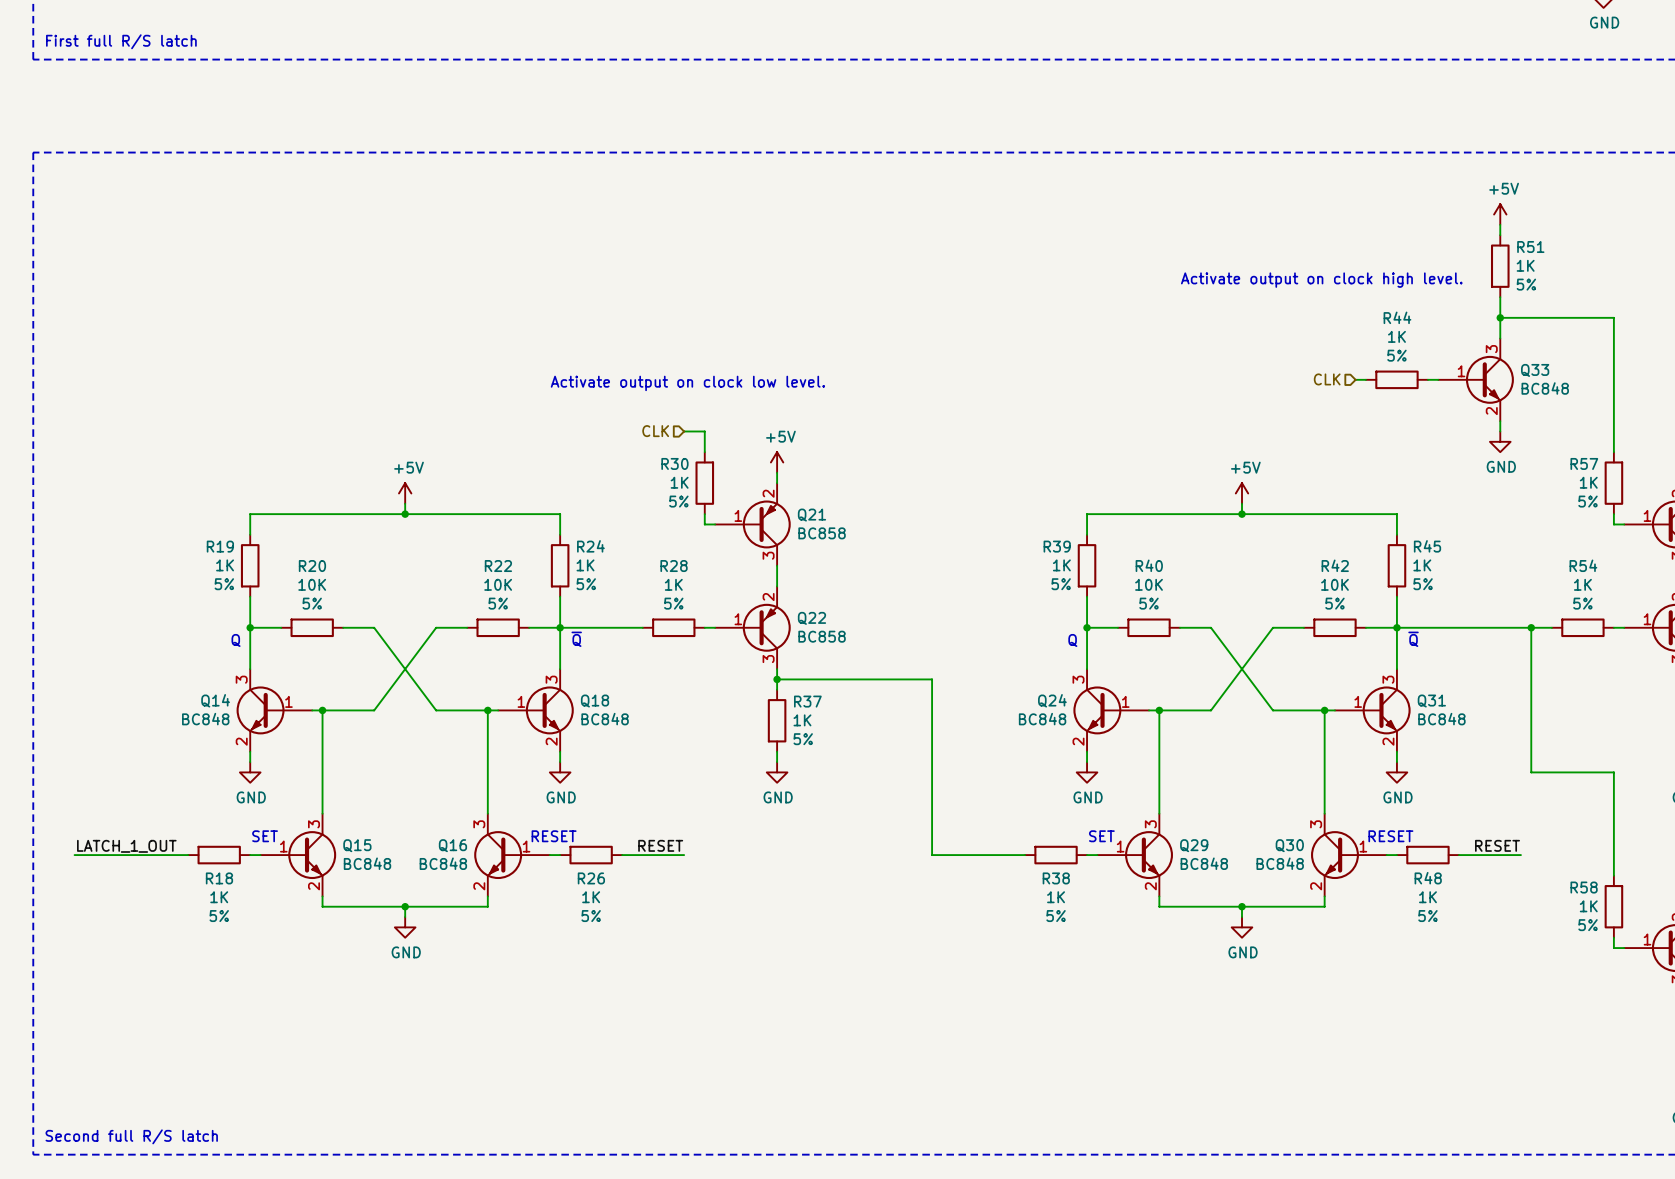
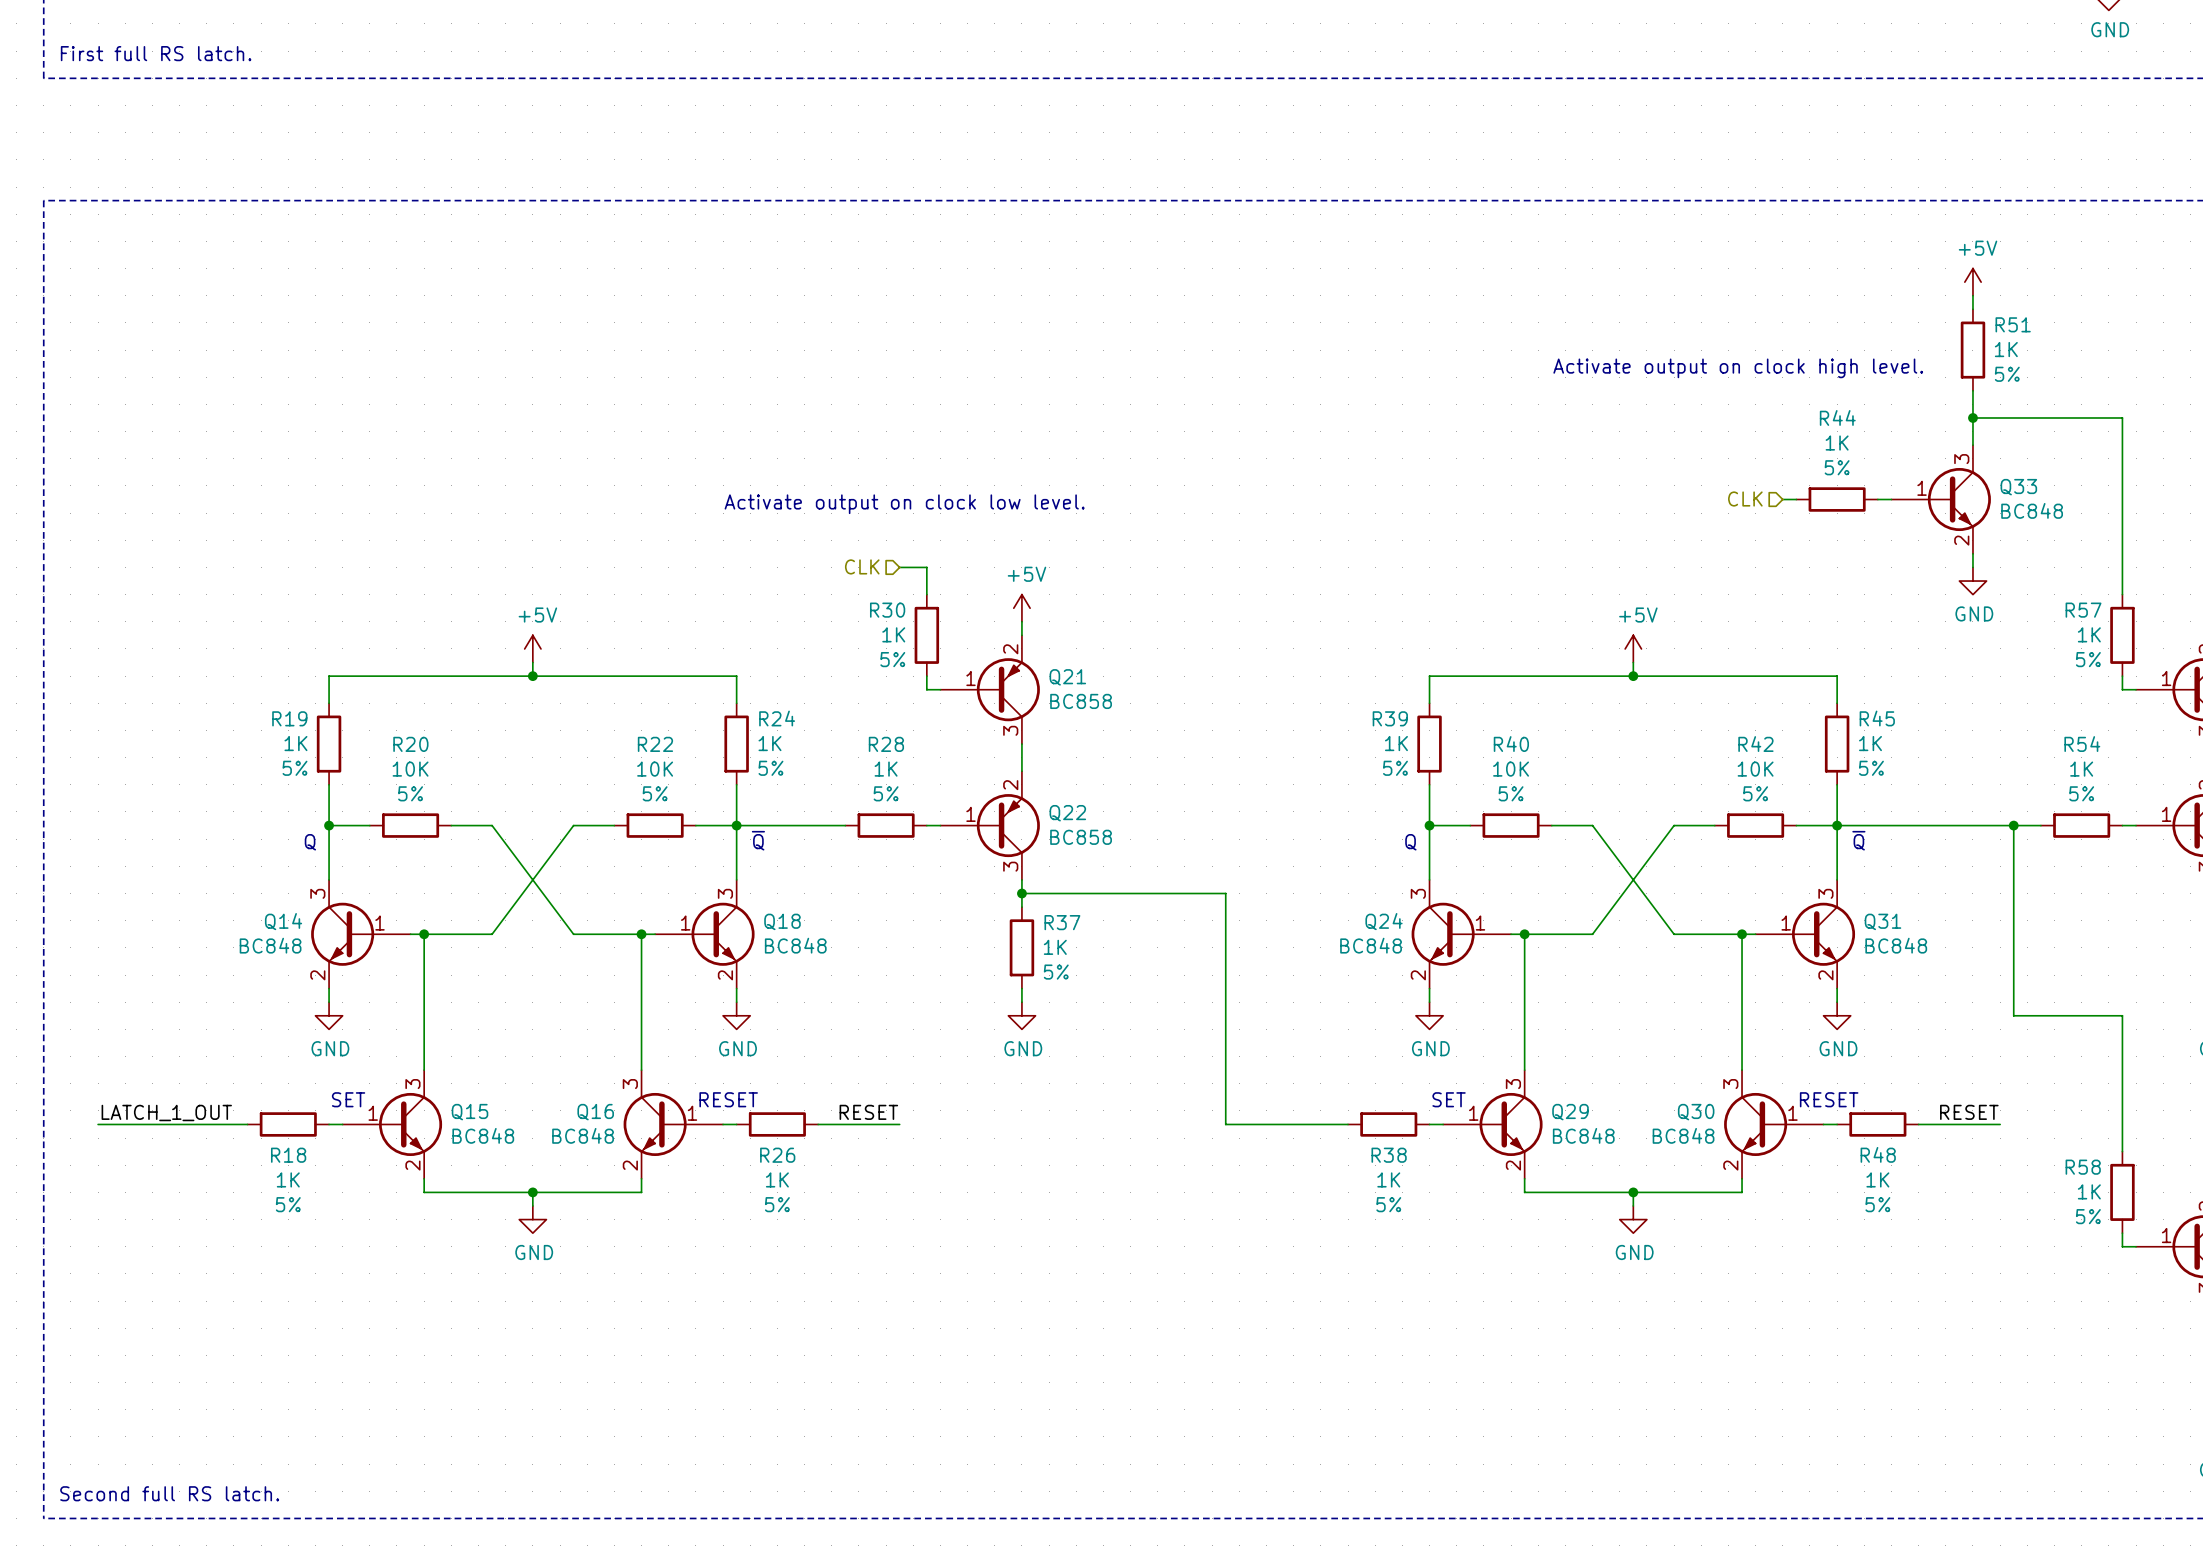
text: First full R/S latch (121, 41) -> First full RS latch. (156, 53)
text: Second full R/S latch (131, 1136) -> Second full RS latch. (169, 1493)

